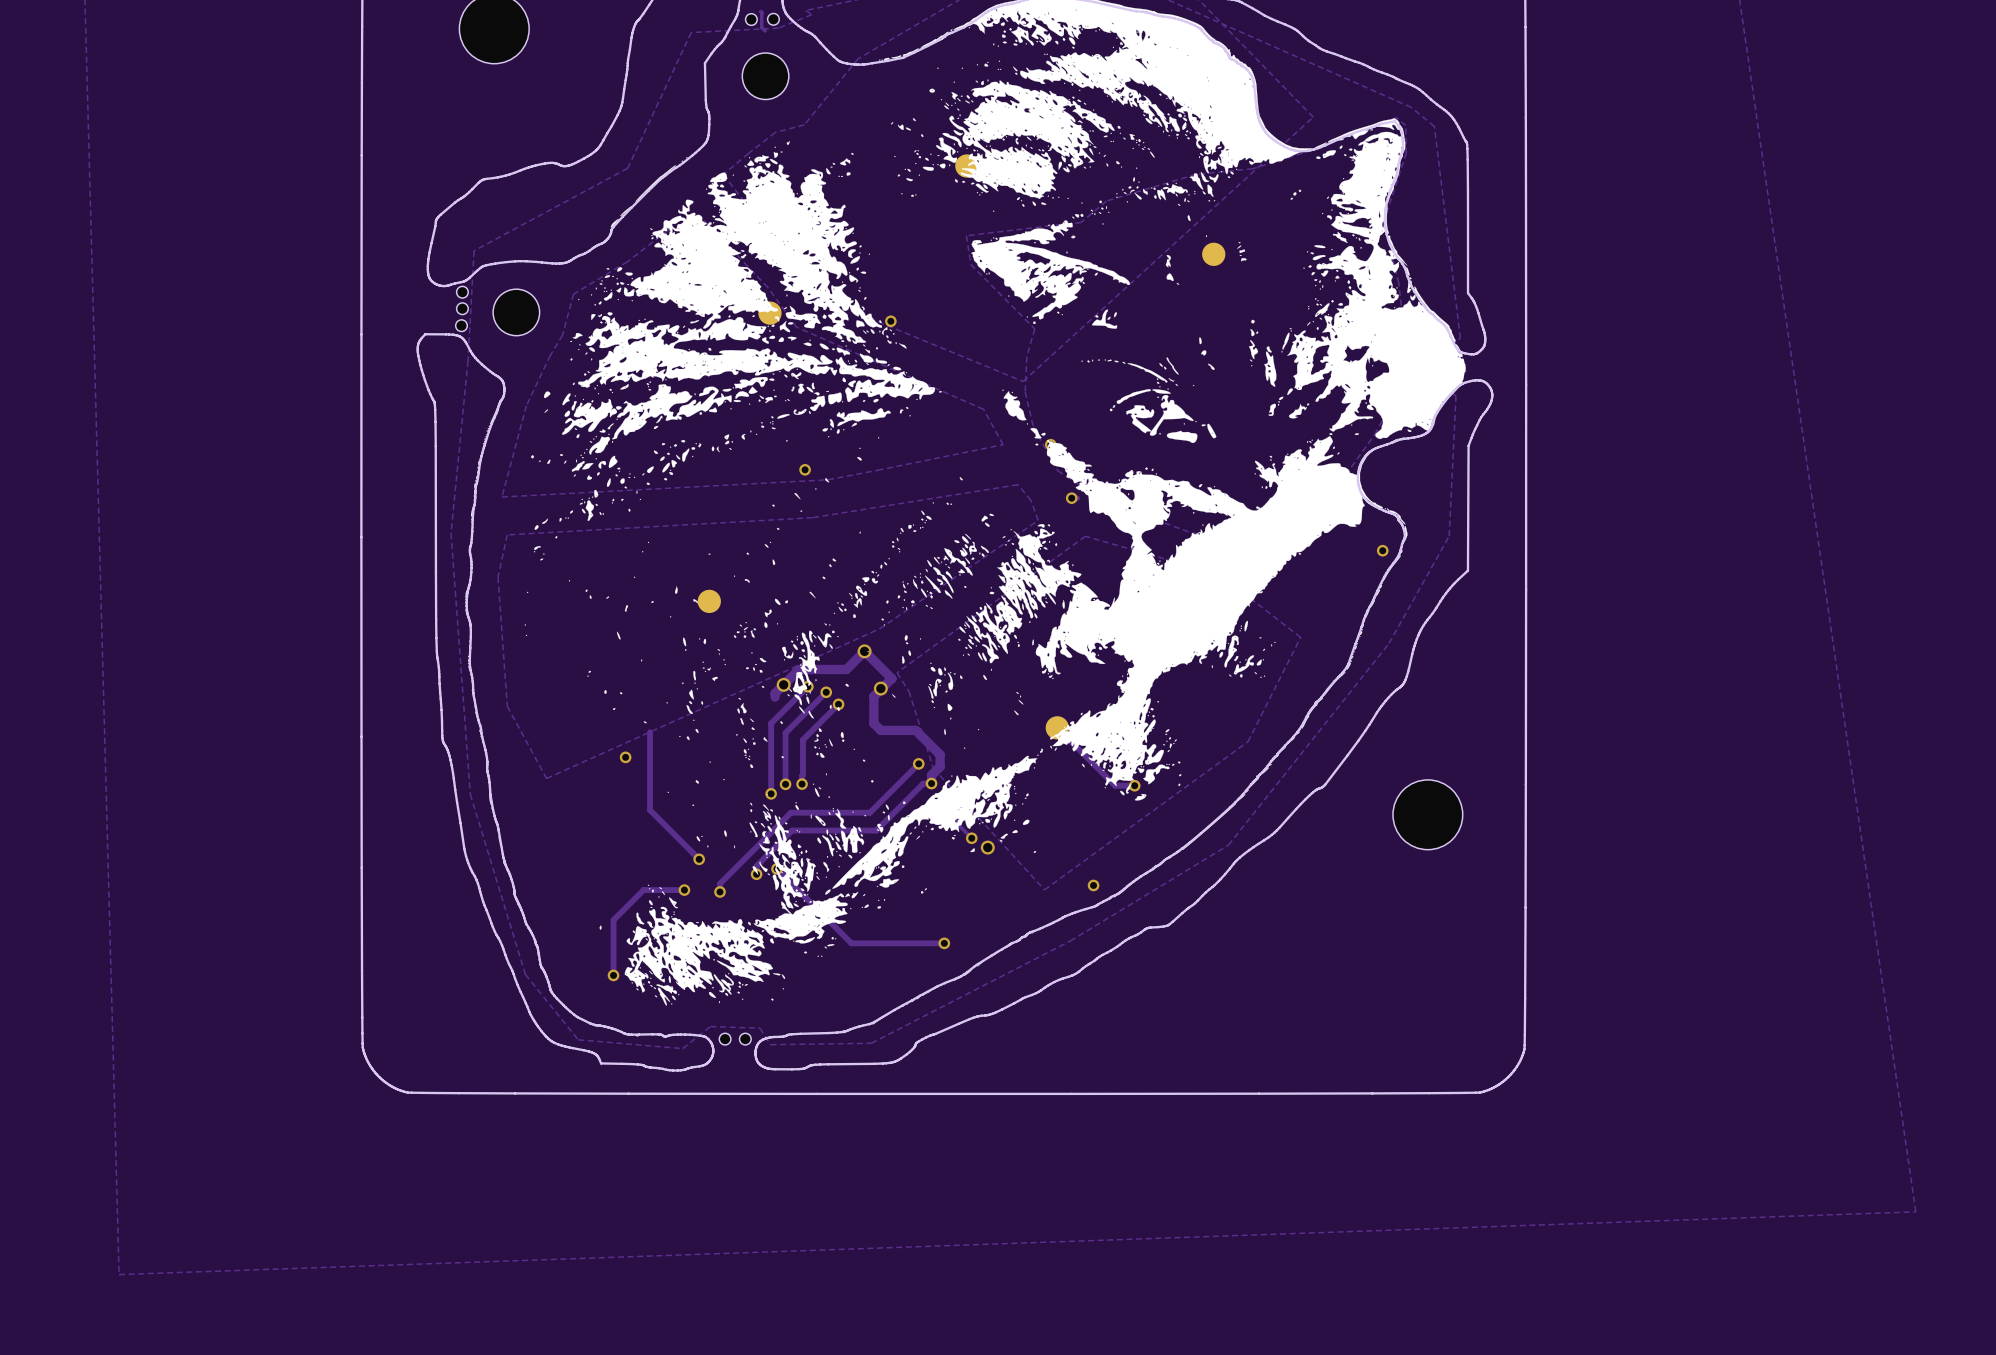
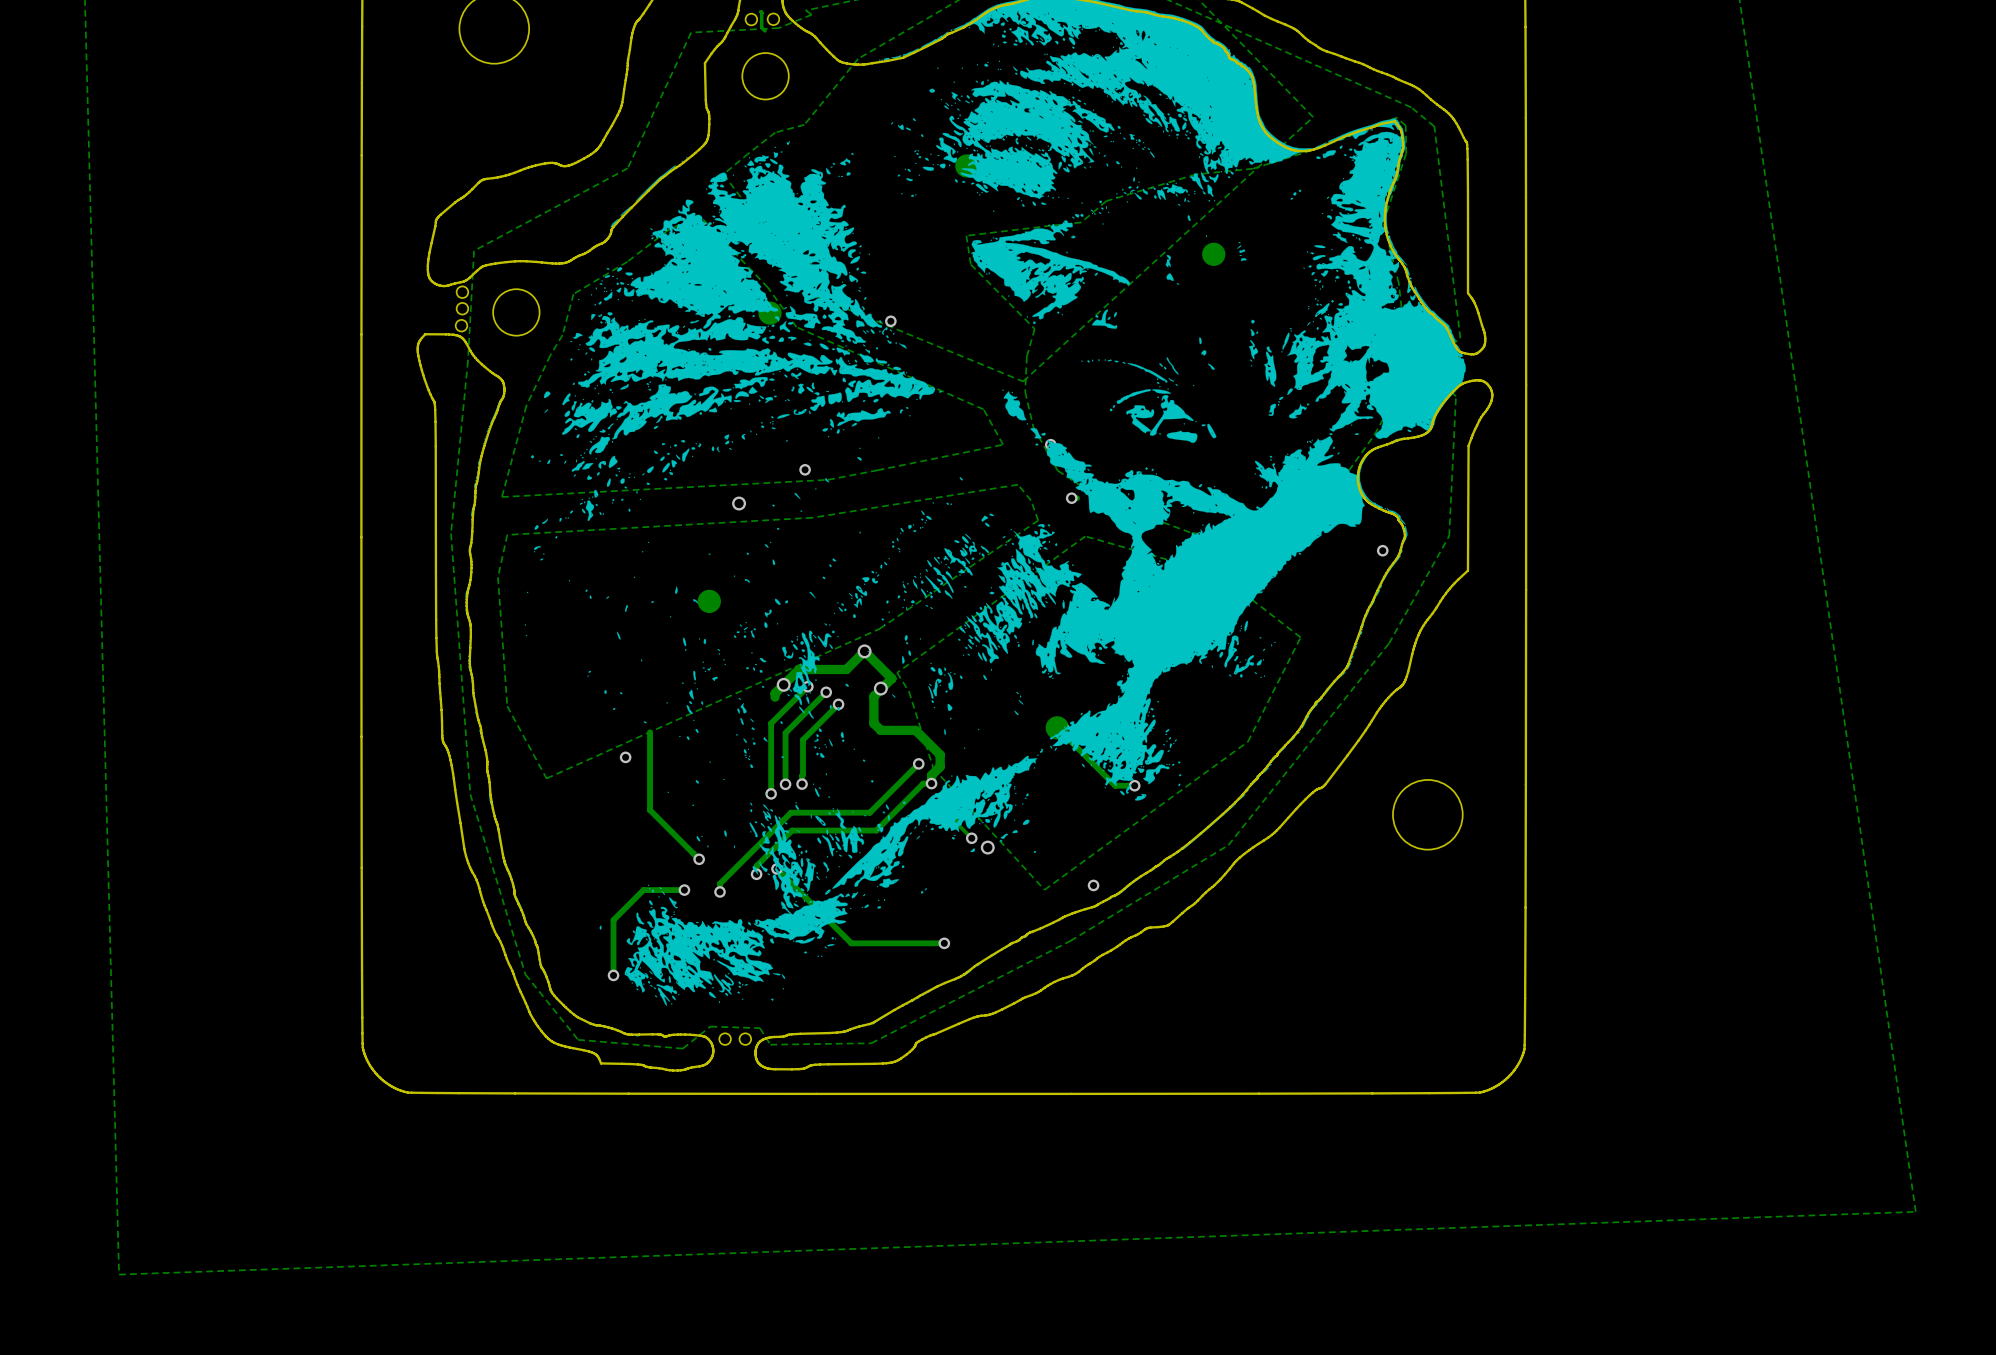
via: none -> (739, 503)

